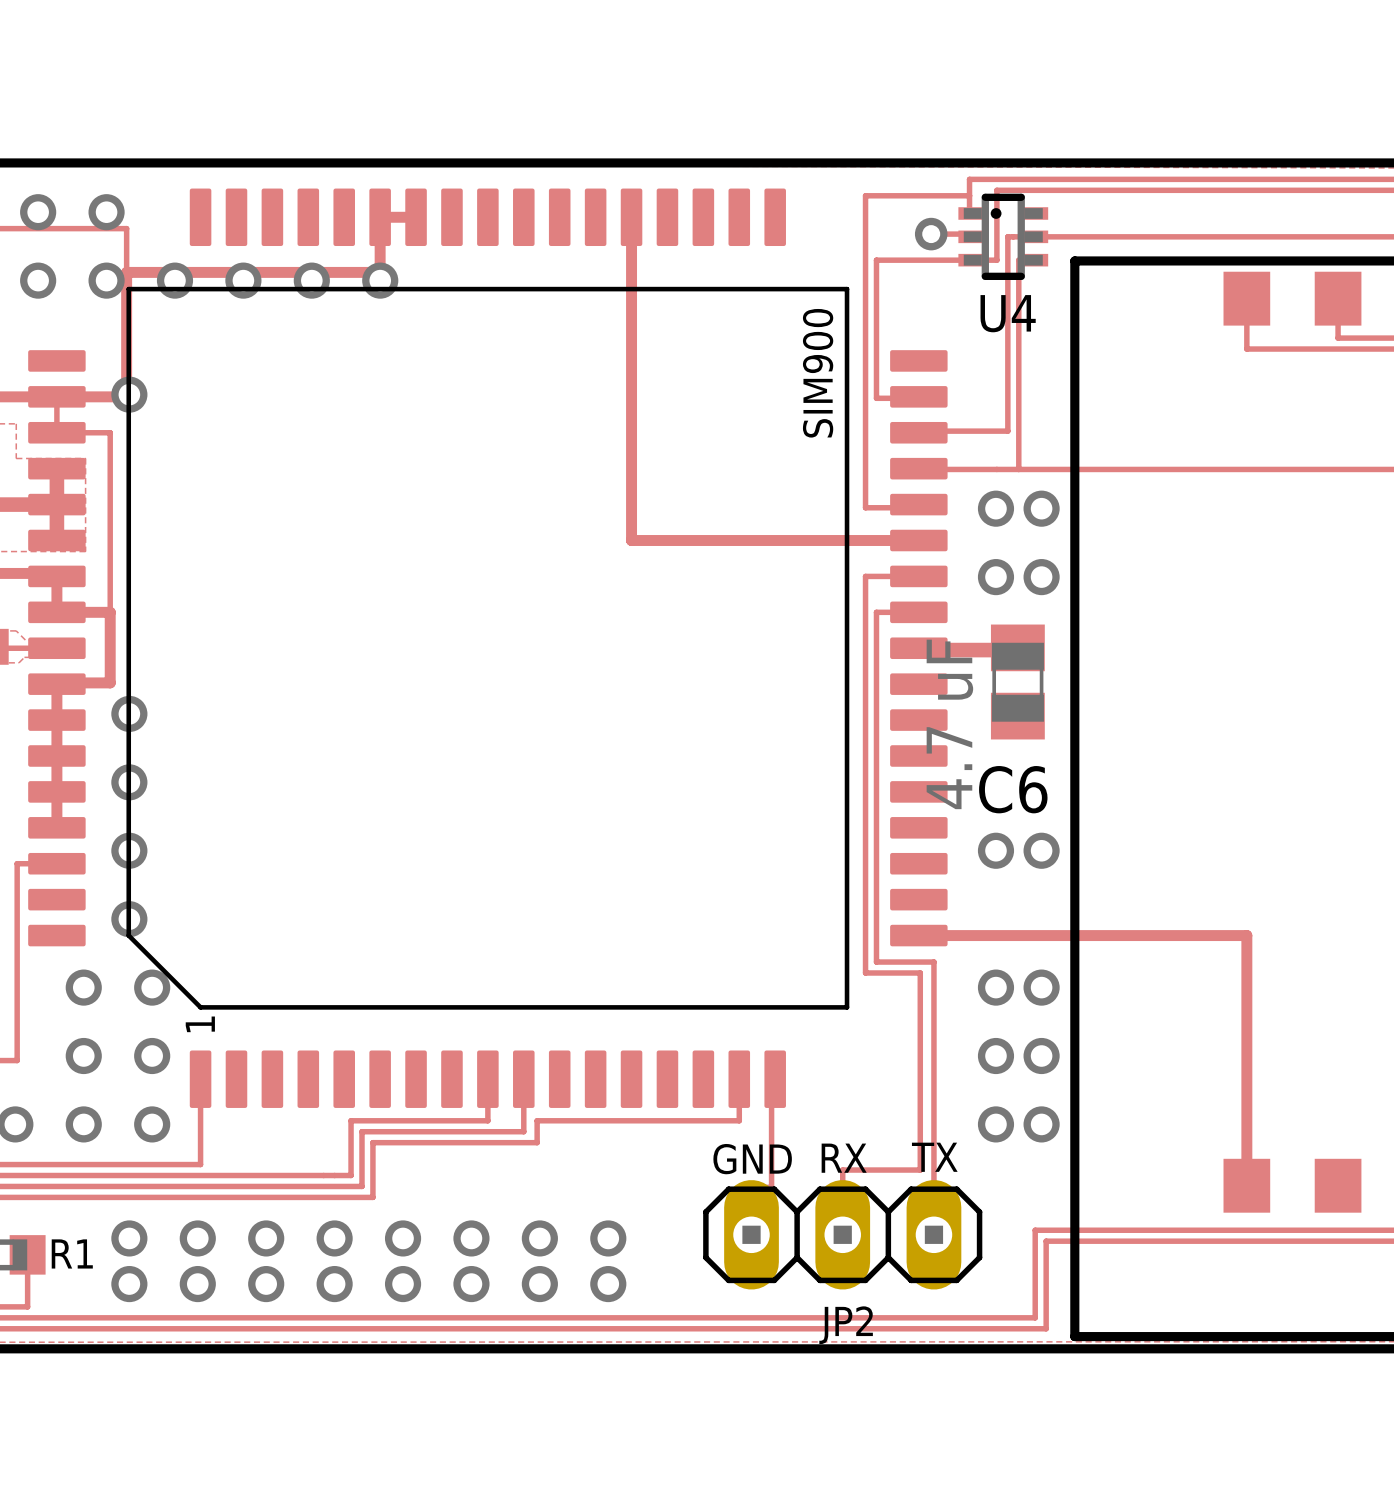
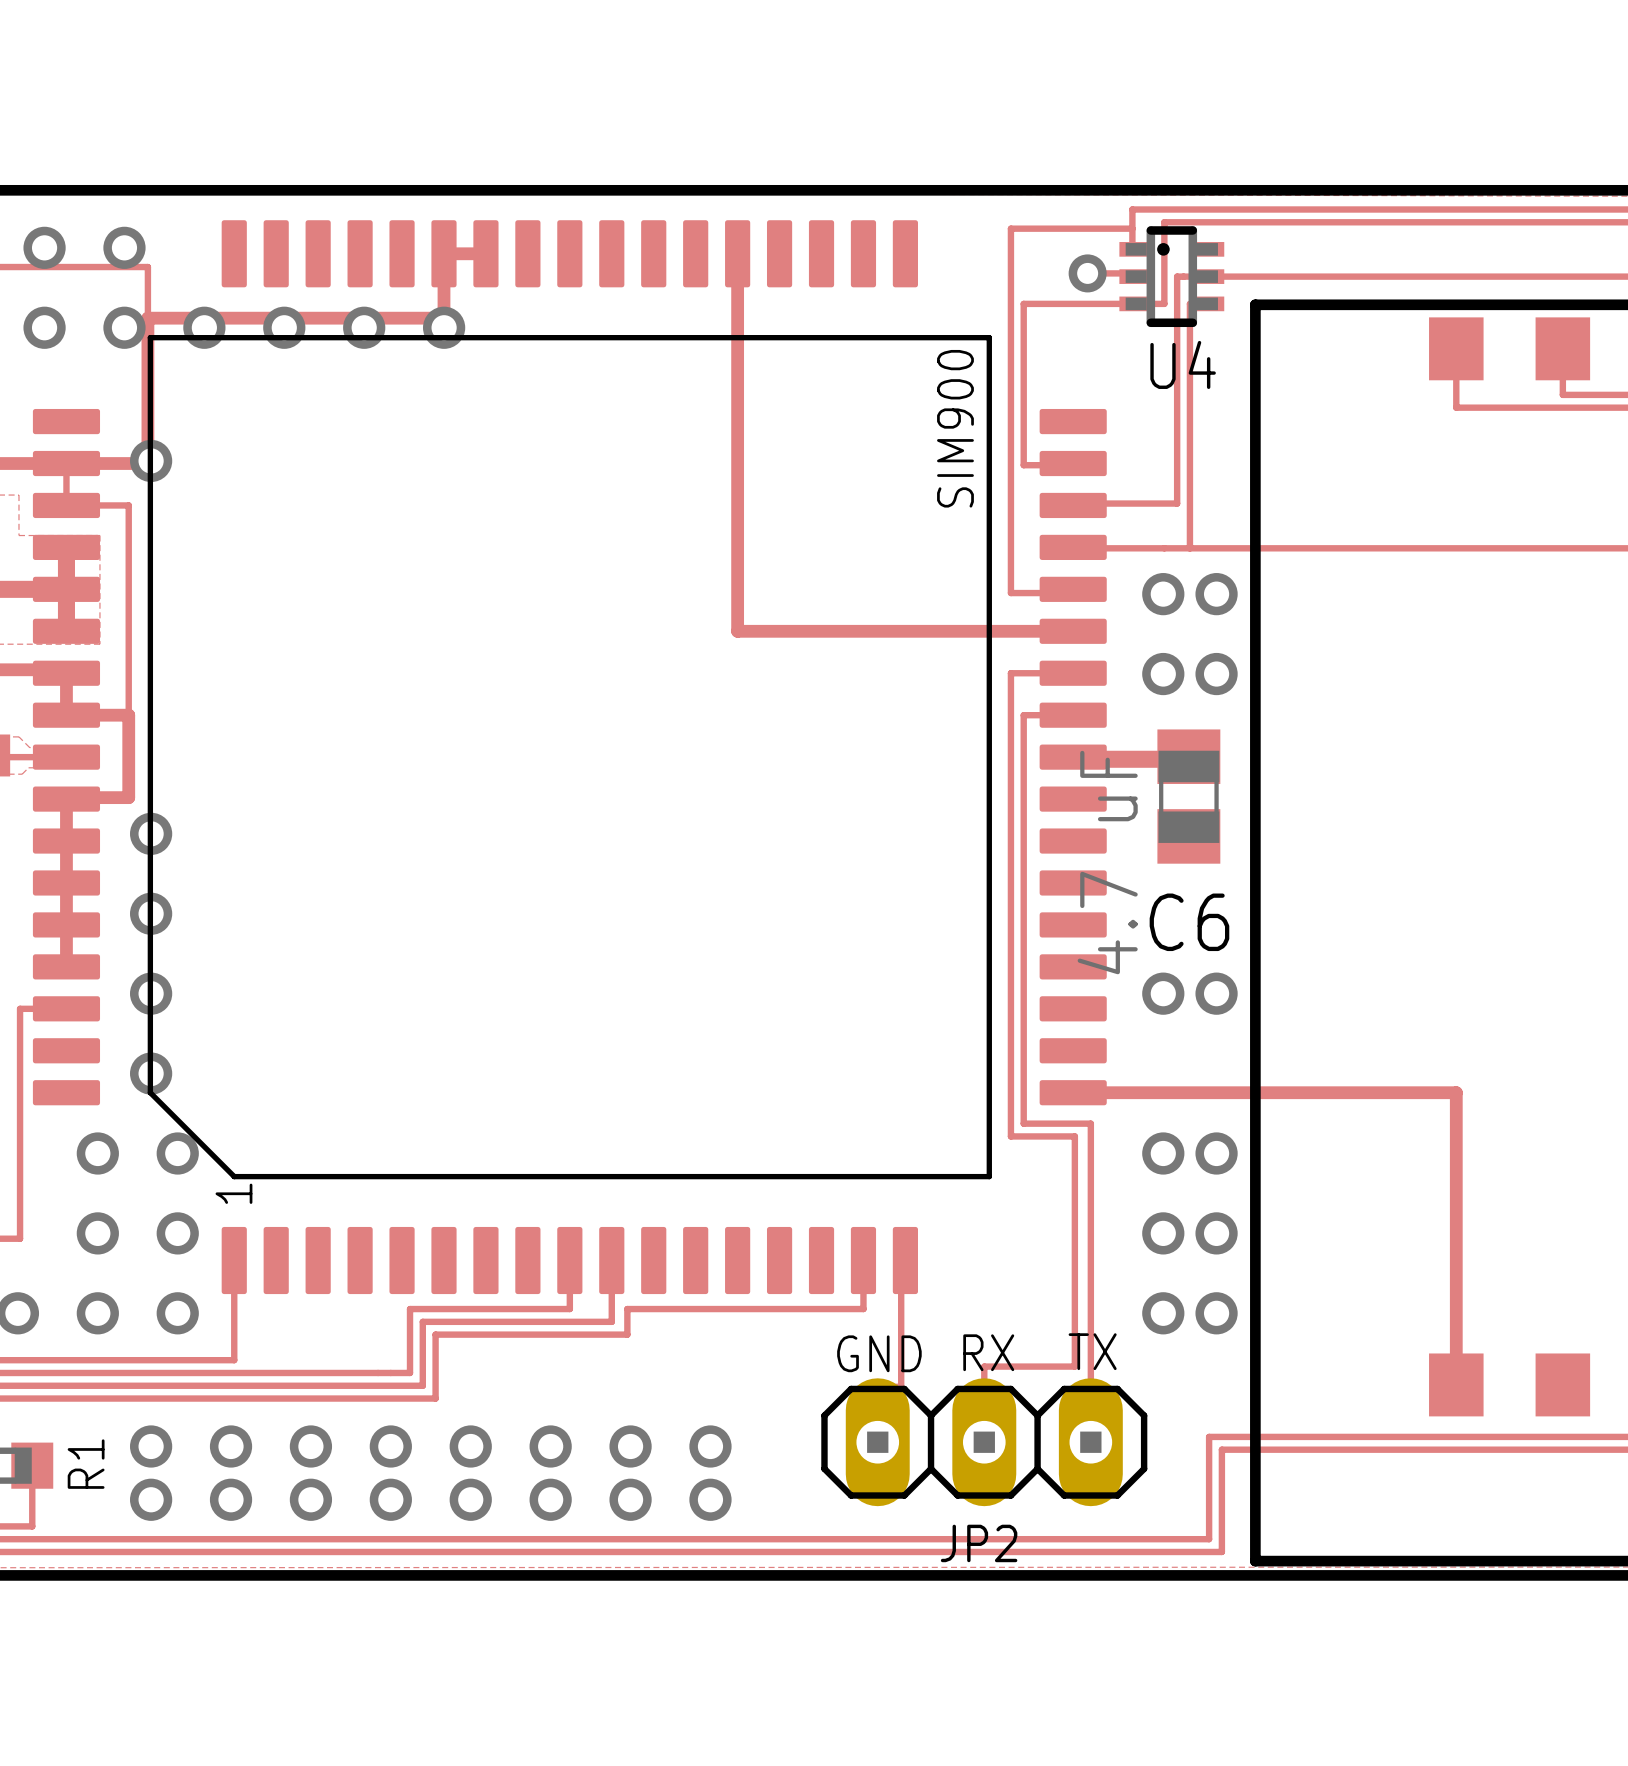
R1 name rotation: 0° (72, 1253) -> 90° counterclockwise (86, 1464)

